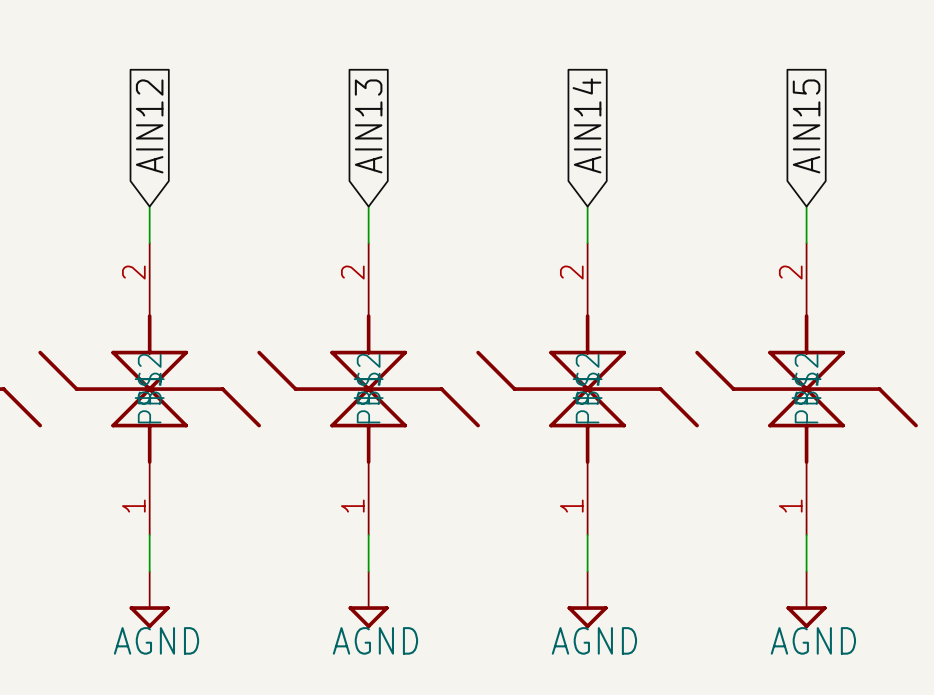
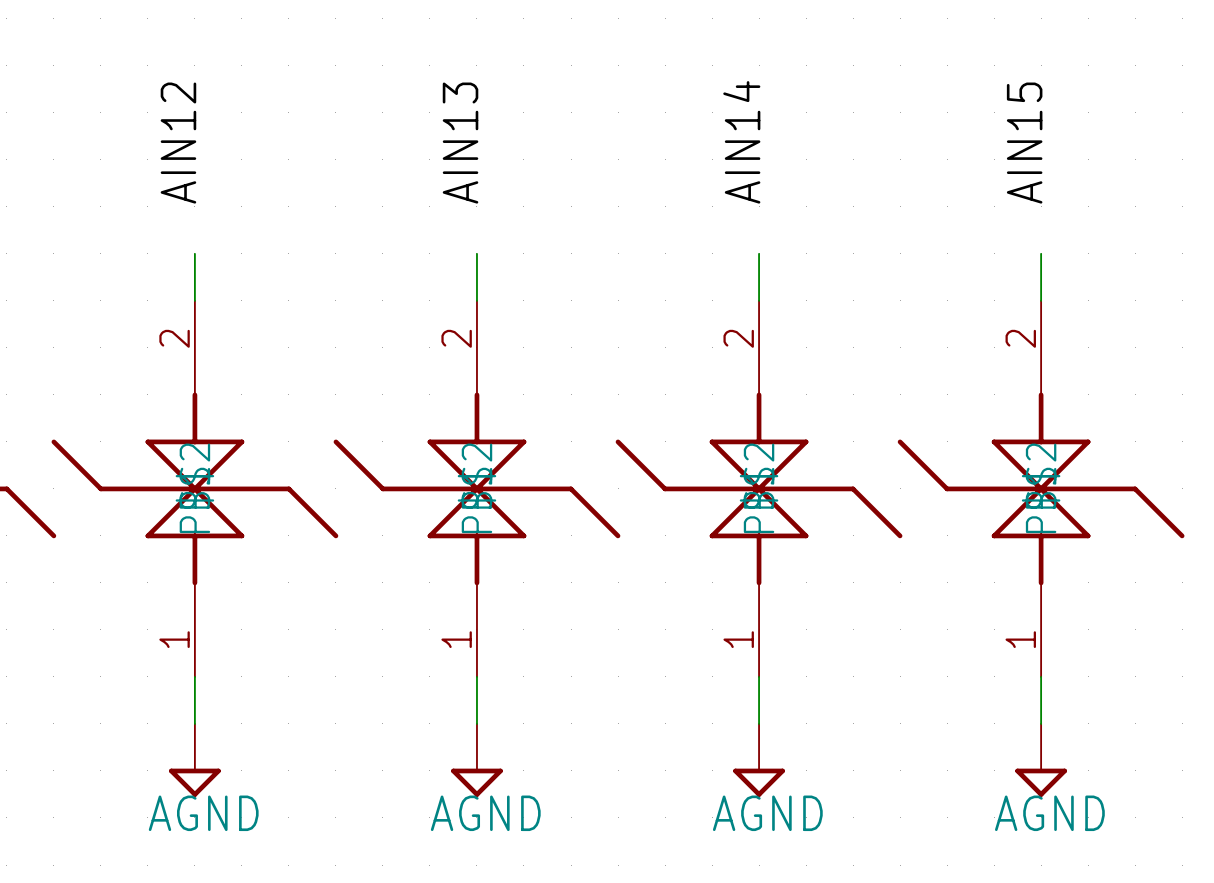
label: none -> AIN12 (178, 143)
label: none -> AIN13 (460, 143)
label: none -> AIN14 (741, 142)
label: none -> AIN15 (1024, 143)
global label: AIN14 (586, 125) -> none
global label: AIN12 (149, 126) -> none
global label: AIN13 (368, 126) -> none
global label: AIN15 (806, 126) -> none

